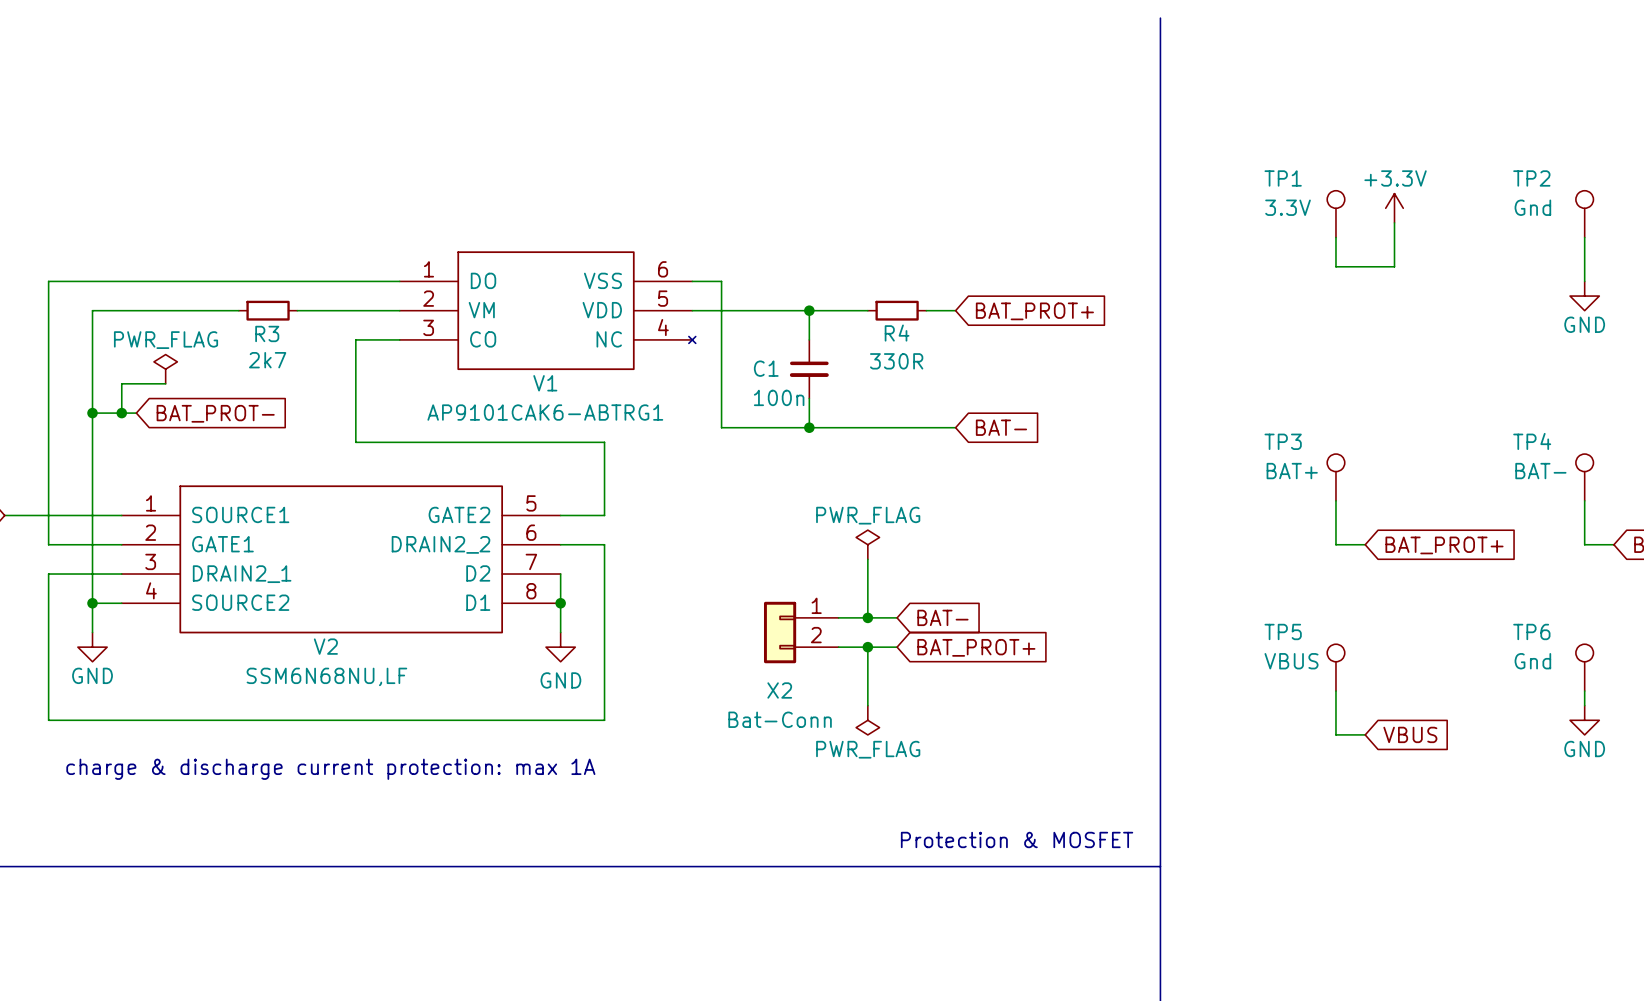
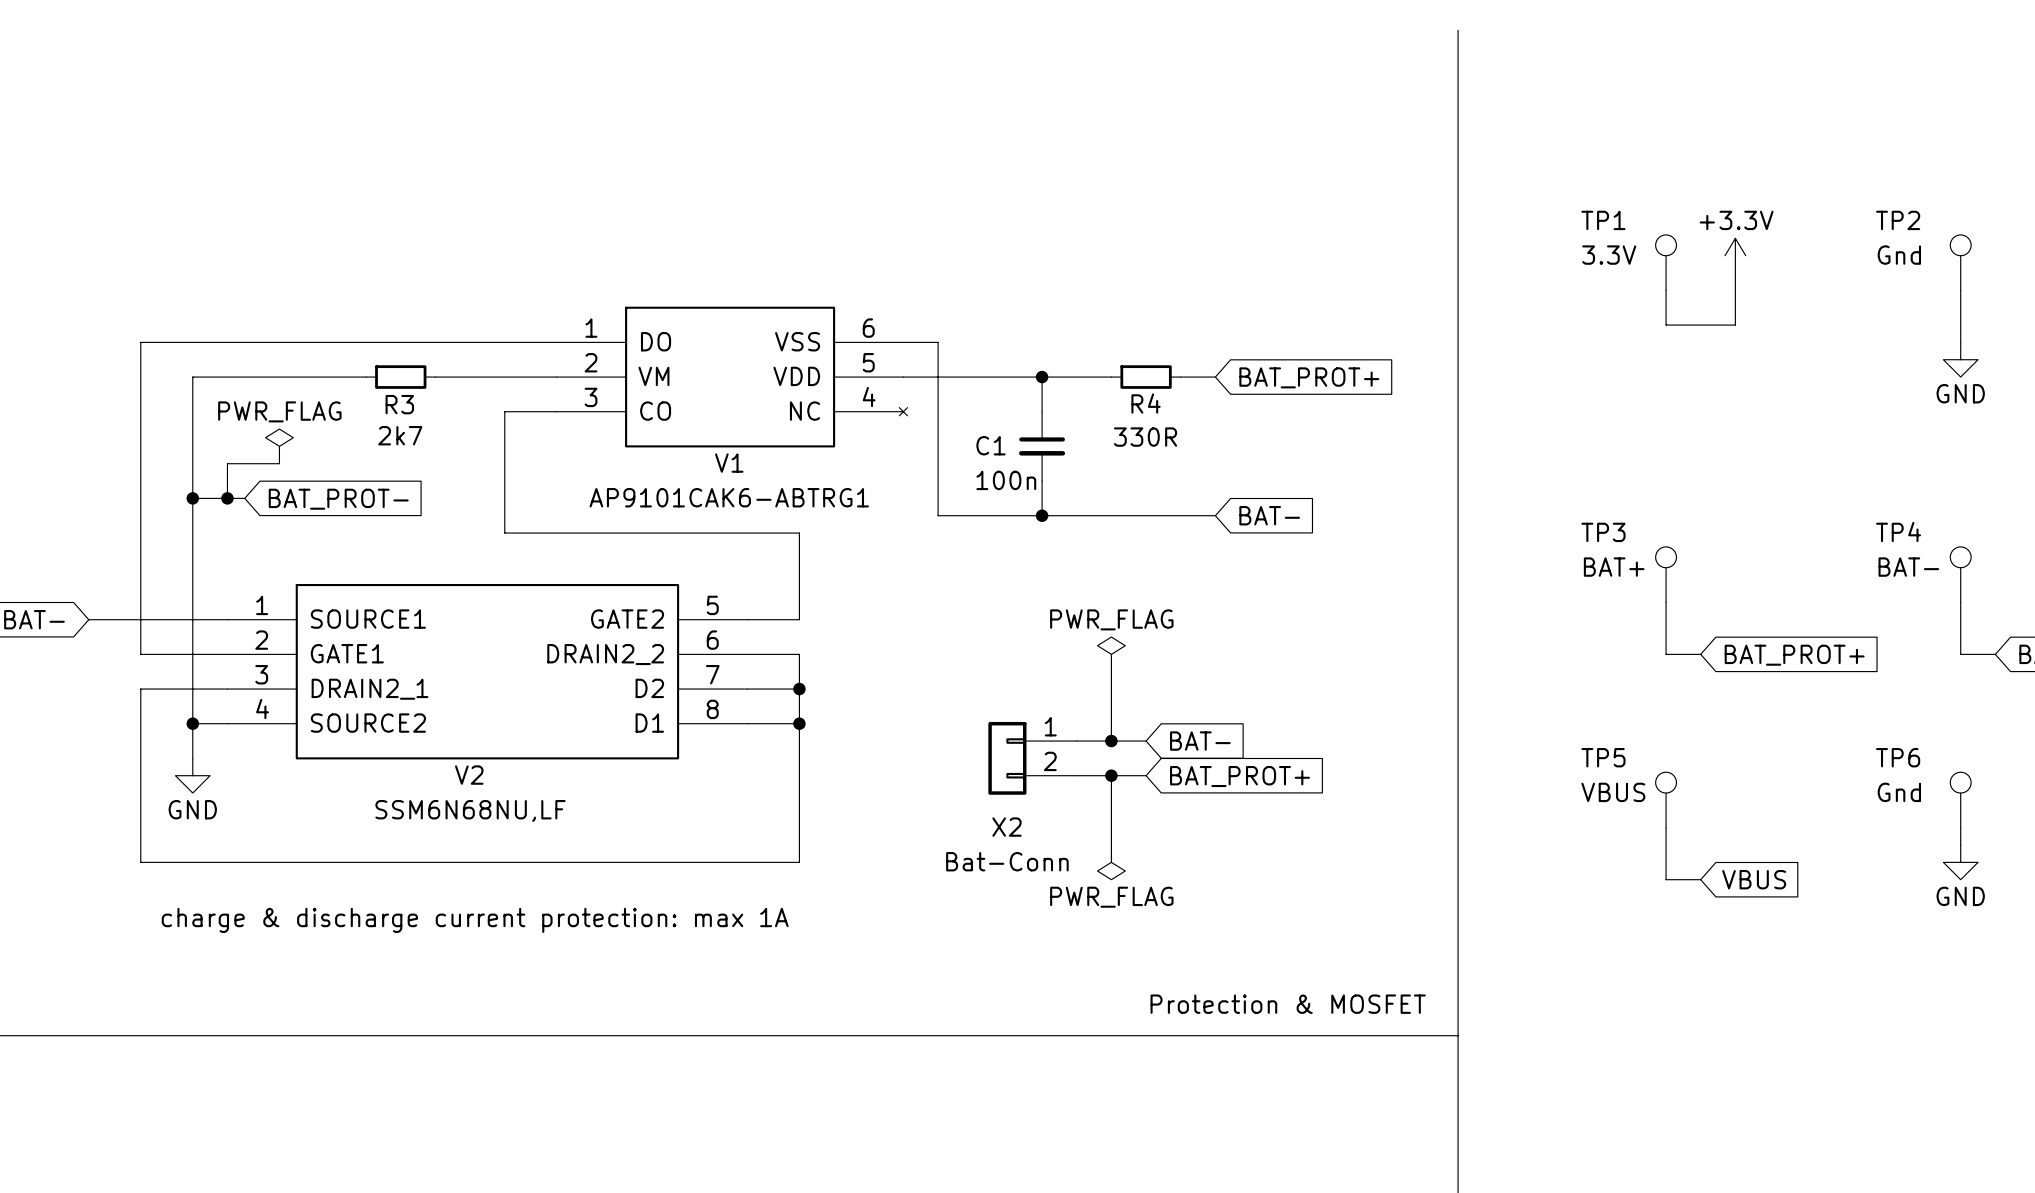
wire: (560, 574) (560, 632) -> (747, 689) (799, 689)
junction: none -> (799, 689)
wire: none -> (747, 723) (799, 723)
junction: (560, 603) -> none
junction: none -> (799, 723)
power symbol: GND (560, 647) -> none

